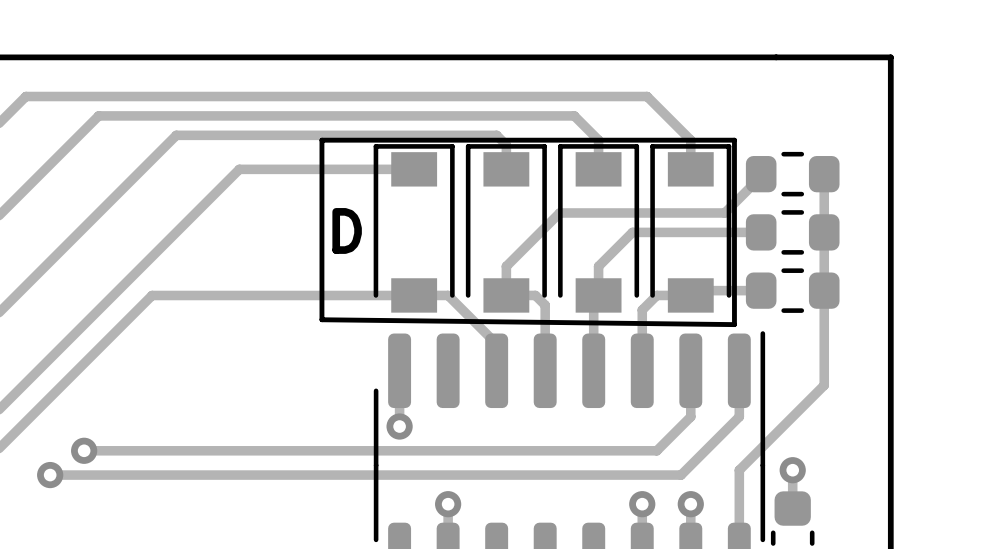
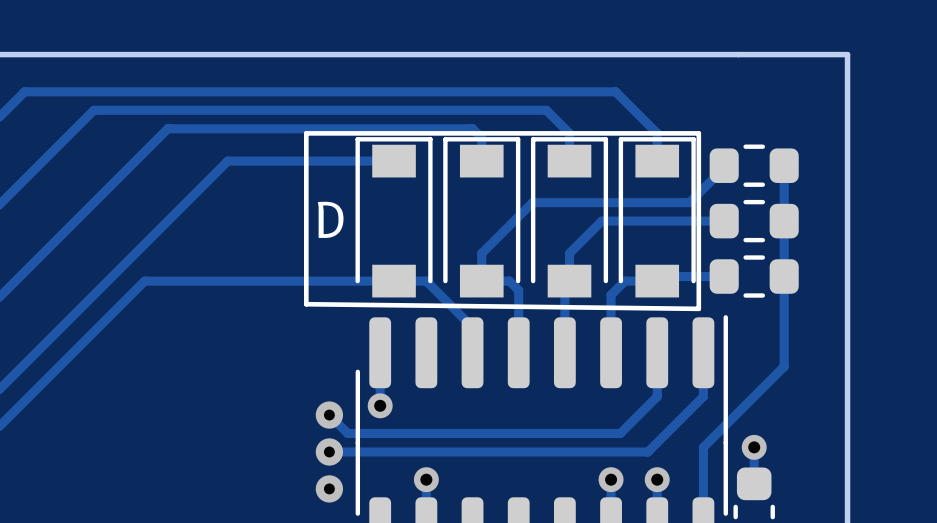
via: none -> (329, 415)
via: (84, 450) -> none
track: (656, 450) (84, 450) -> (624, 428) (620, 433) (347, 433) (329, 415)
via: (50, 475) -> none
track: (346, 475) (50, 475) -> none
via: none -> (329, 451)
via: none -> (329, 488)

